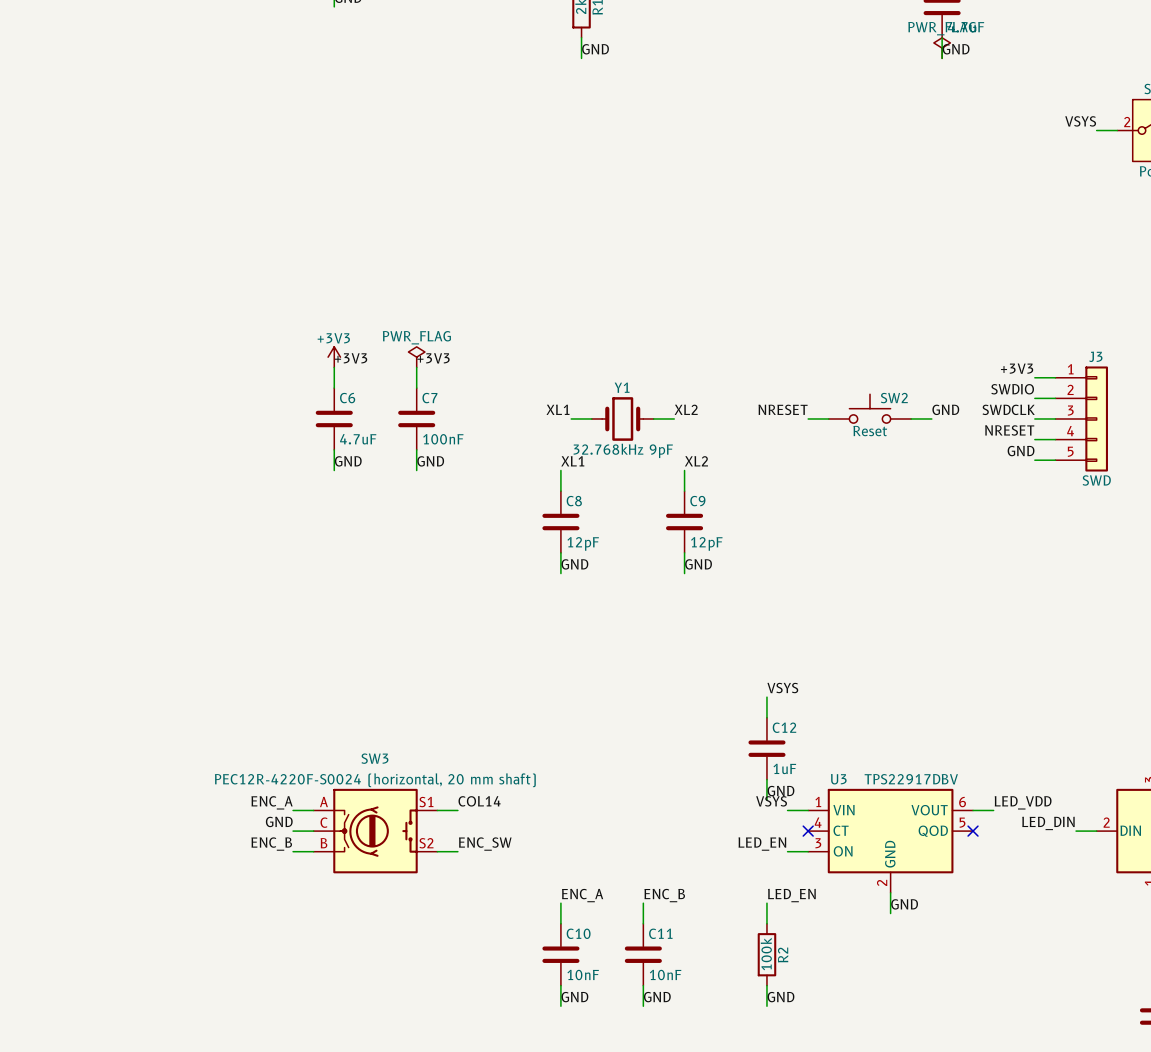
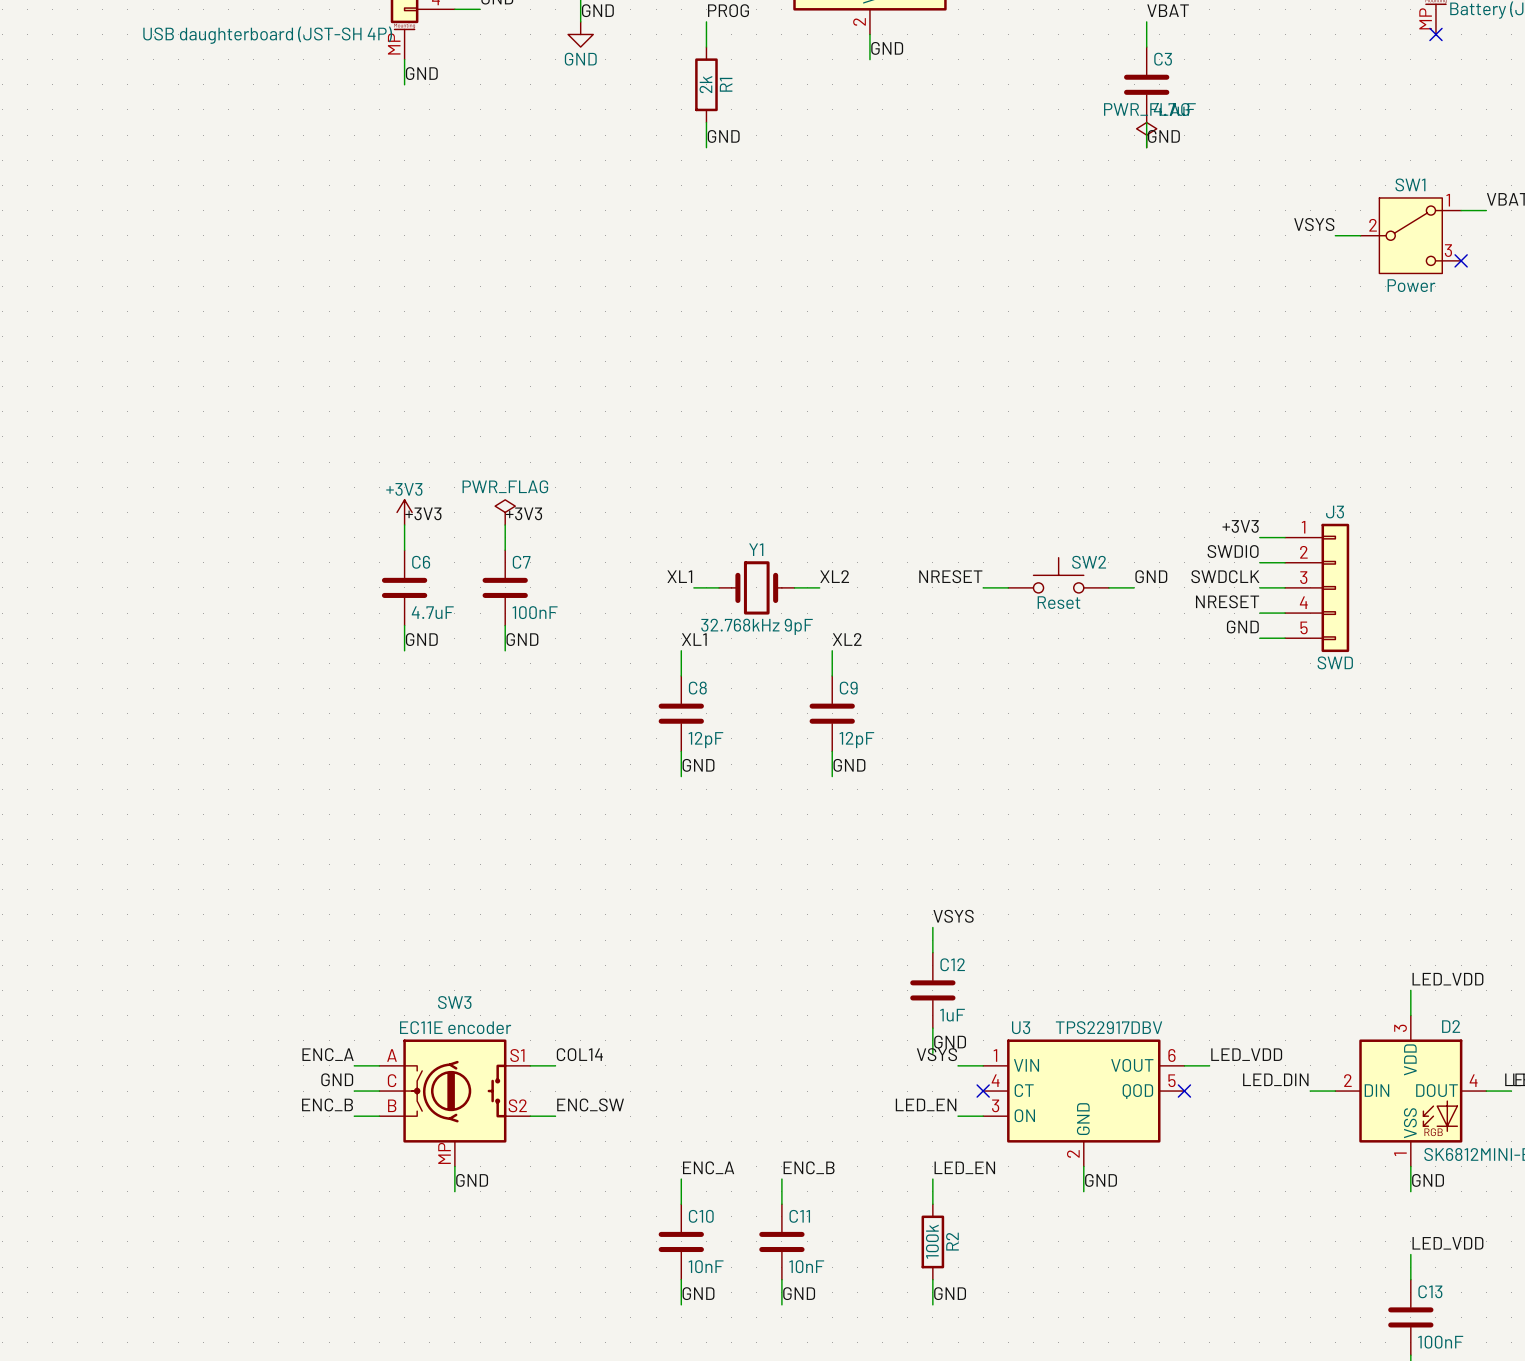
SW3 value: PEC12R-4220F-S0024 (horizontal, 20 mm shaft) (375, 780) -> EC11E encoder (455, 1027)
SW3 symbol: [313, 788, 438, 874] -> [379, 1039, 531, 1167]
wire: none -> (454, 1166) (454, 1191)
label: none -> GND (472, 1180)

